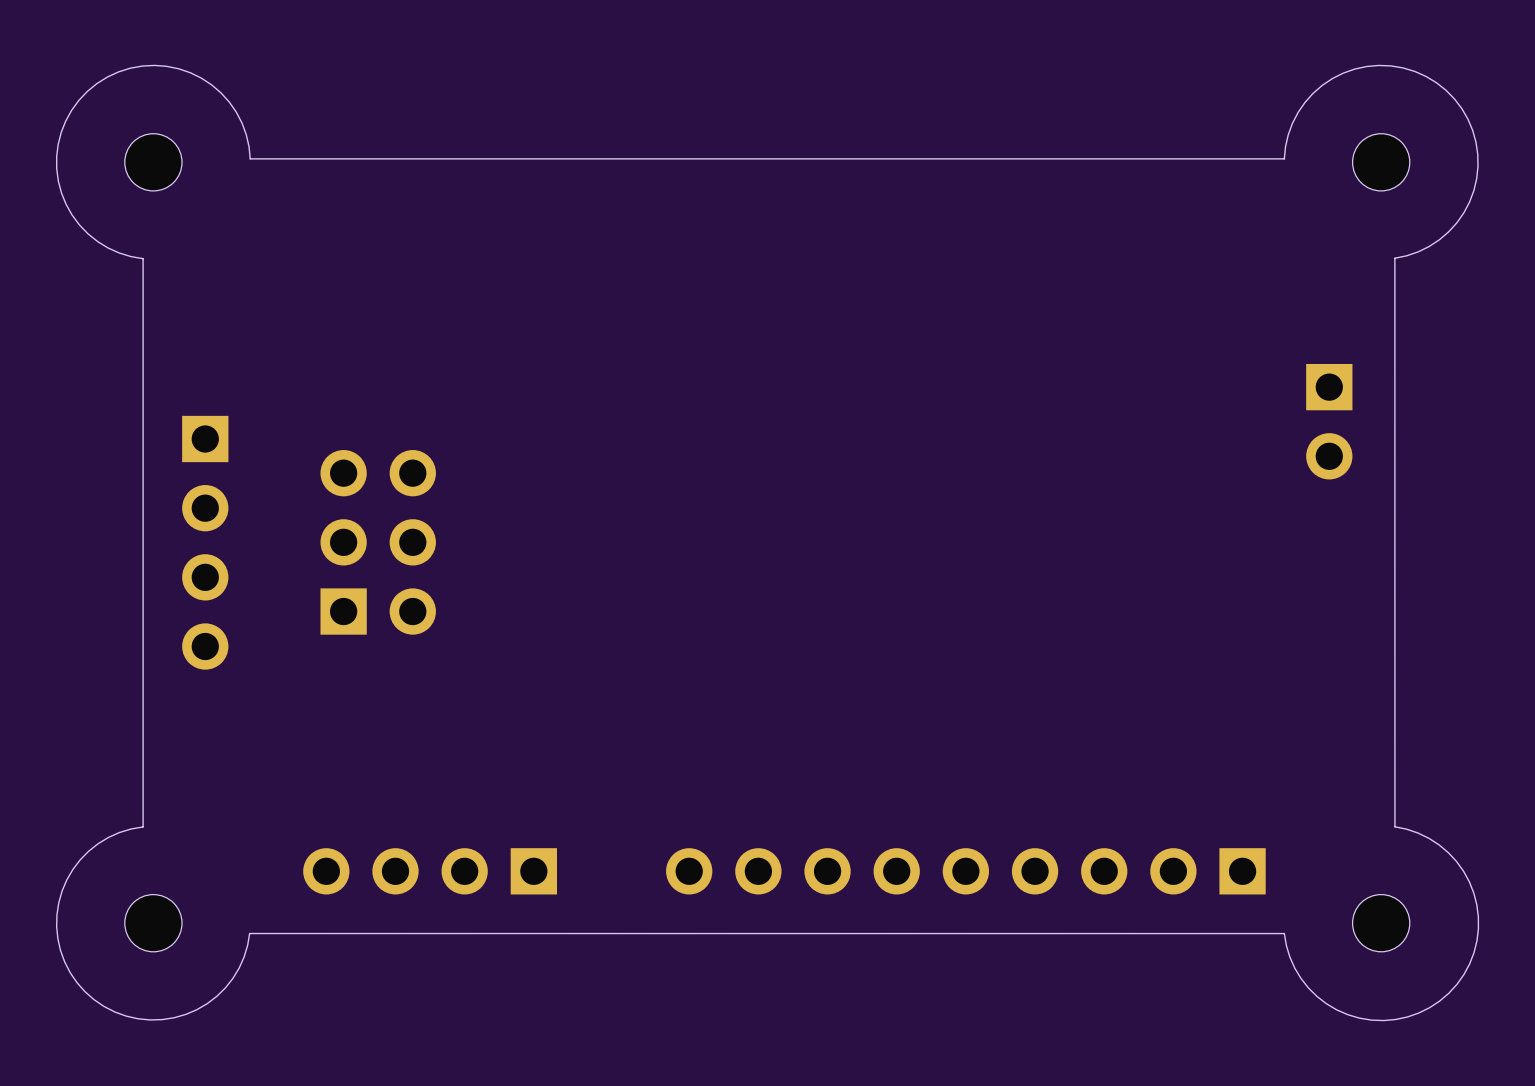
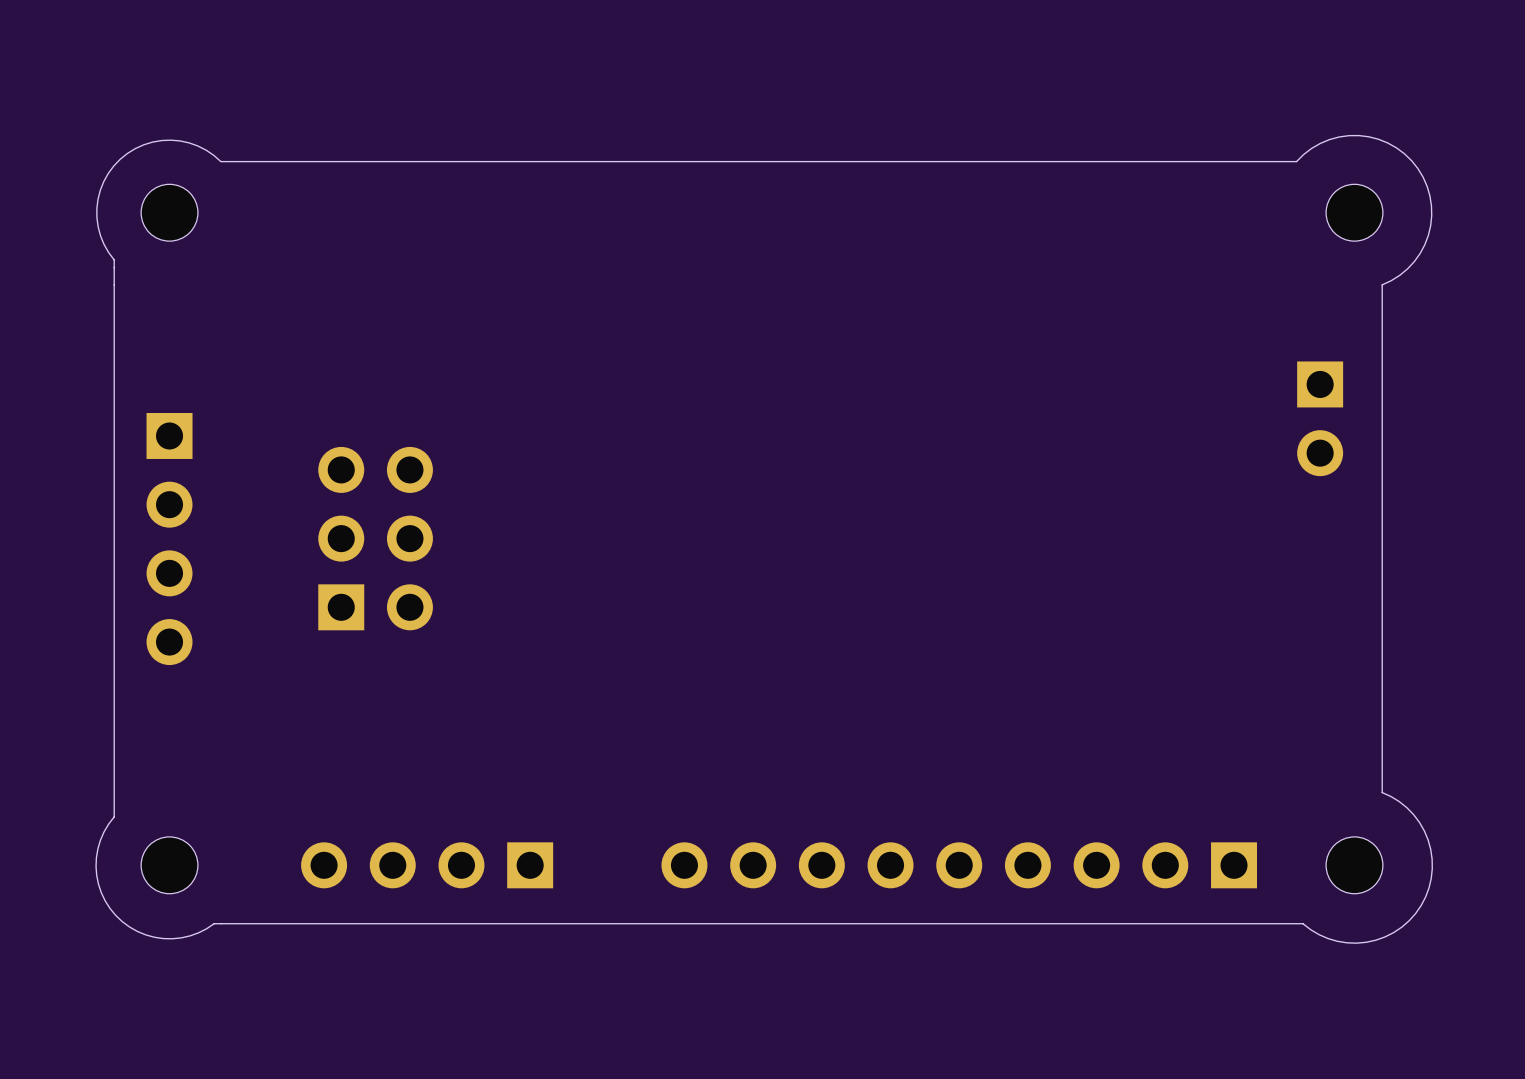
part position: (153, 162) -> (169, 212)
part position: (1381, 162) -> (1354, 212)
part position: (205, 542) -> (169, 539)
part position: (153, 923) -> (169, 865)
part position: (1381, 923) -> (1354, 865)
board edge: (249, 933) (1284, 933) (1289, 957) (1300, 978) (1316, 996) (1347, 1014) (1371, 1020) (1395, 1019) (1418, 1013) (1439, 1001) (1456, 984) (1469, 963) (1476, 940) (1478, 916) (1469, 881) (1456, 861) (1429, 838) (1394, 826) (1394, 258) (1418, 251) (1439, 239) (1456, 222) (1469, 201) (1476, 178) (1477, 154) (1472, 130) (1461, 108) (1445, 90) (1425, 76) (1403, 67) (1378, 65) (1354, 69) (1343, 73) (1332, 78) (1313, 93) (1298, 112) (1292, 123) (1285, 146) (1284, 158) (250, 158) (249, 146) (242, 123) (229, 102) (211, 84) (190, 72) (166, 66) (142, 66) (118, 71) (96, 83) (78, 100) (65, 121) (58, 144) (56, 168) (58, 181) (66, 204) (79, 224) (87, 233) (97, 241) (119, 252) (143, 258) (143, 826) (131, 828) (108, 837) (98, 843) (80, 859) (72, 869) (62, 891) (56, 914) (57, 938) (60, 950) (70, 972) (76, 982) (94, 999) (104, 1006) (126, 1016) (149, 1019) (162, 1019) (185, 1014) (196, 1009) (207, 1003) (225, 987) (239, 968) (244, 956) (249, 933) -> (221, 161) (1296, 161) (1320, 143) (1348, 135) (1368, 136) (1396, 147) (1411, 160) (1423, 177) (1429, 195) (1431, 215) (1428, 235) (1414, 261) (1399, 275) (1382, 284) (1382, 792) (1399, 801) (1413, 814) (1428, 839) (1432, 868) (1429, 887) (1421, 905) (1409, 920) (1393, 932) (1375, 940) (1356, 943) (1327, 938) (1302, 923) (214, 923) (190, 935) (172, 938) (154, 937) (129, 927) (115, 915) (105, 901) (98, 884) (96, 866) (100, 840) (114, 816) (114, 259) (100, 235) (96, 208) (100, 190) (113, 166) (127, 153) (143, 144) (161, 140) (180, 140) (206, 150) (220, 161)

